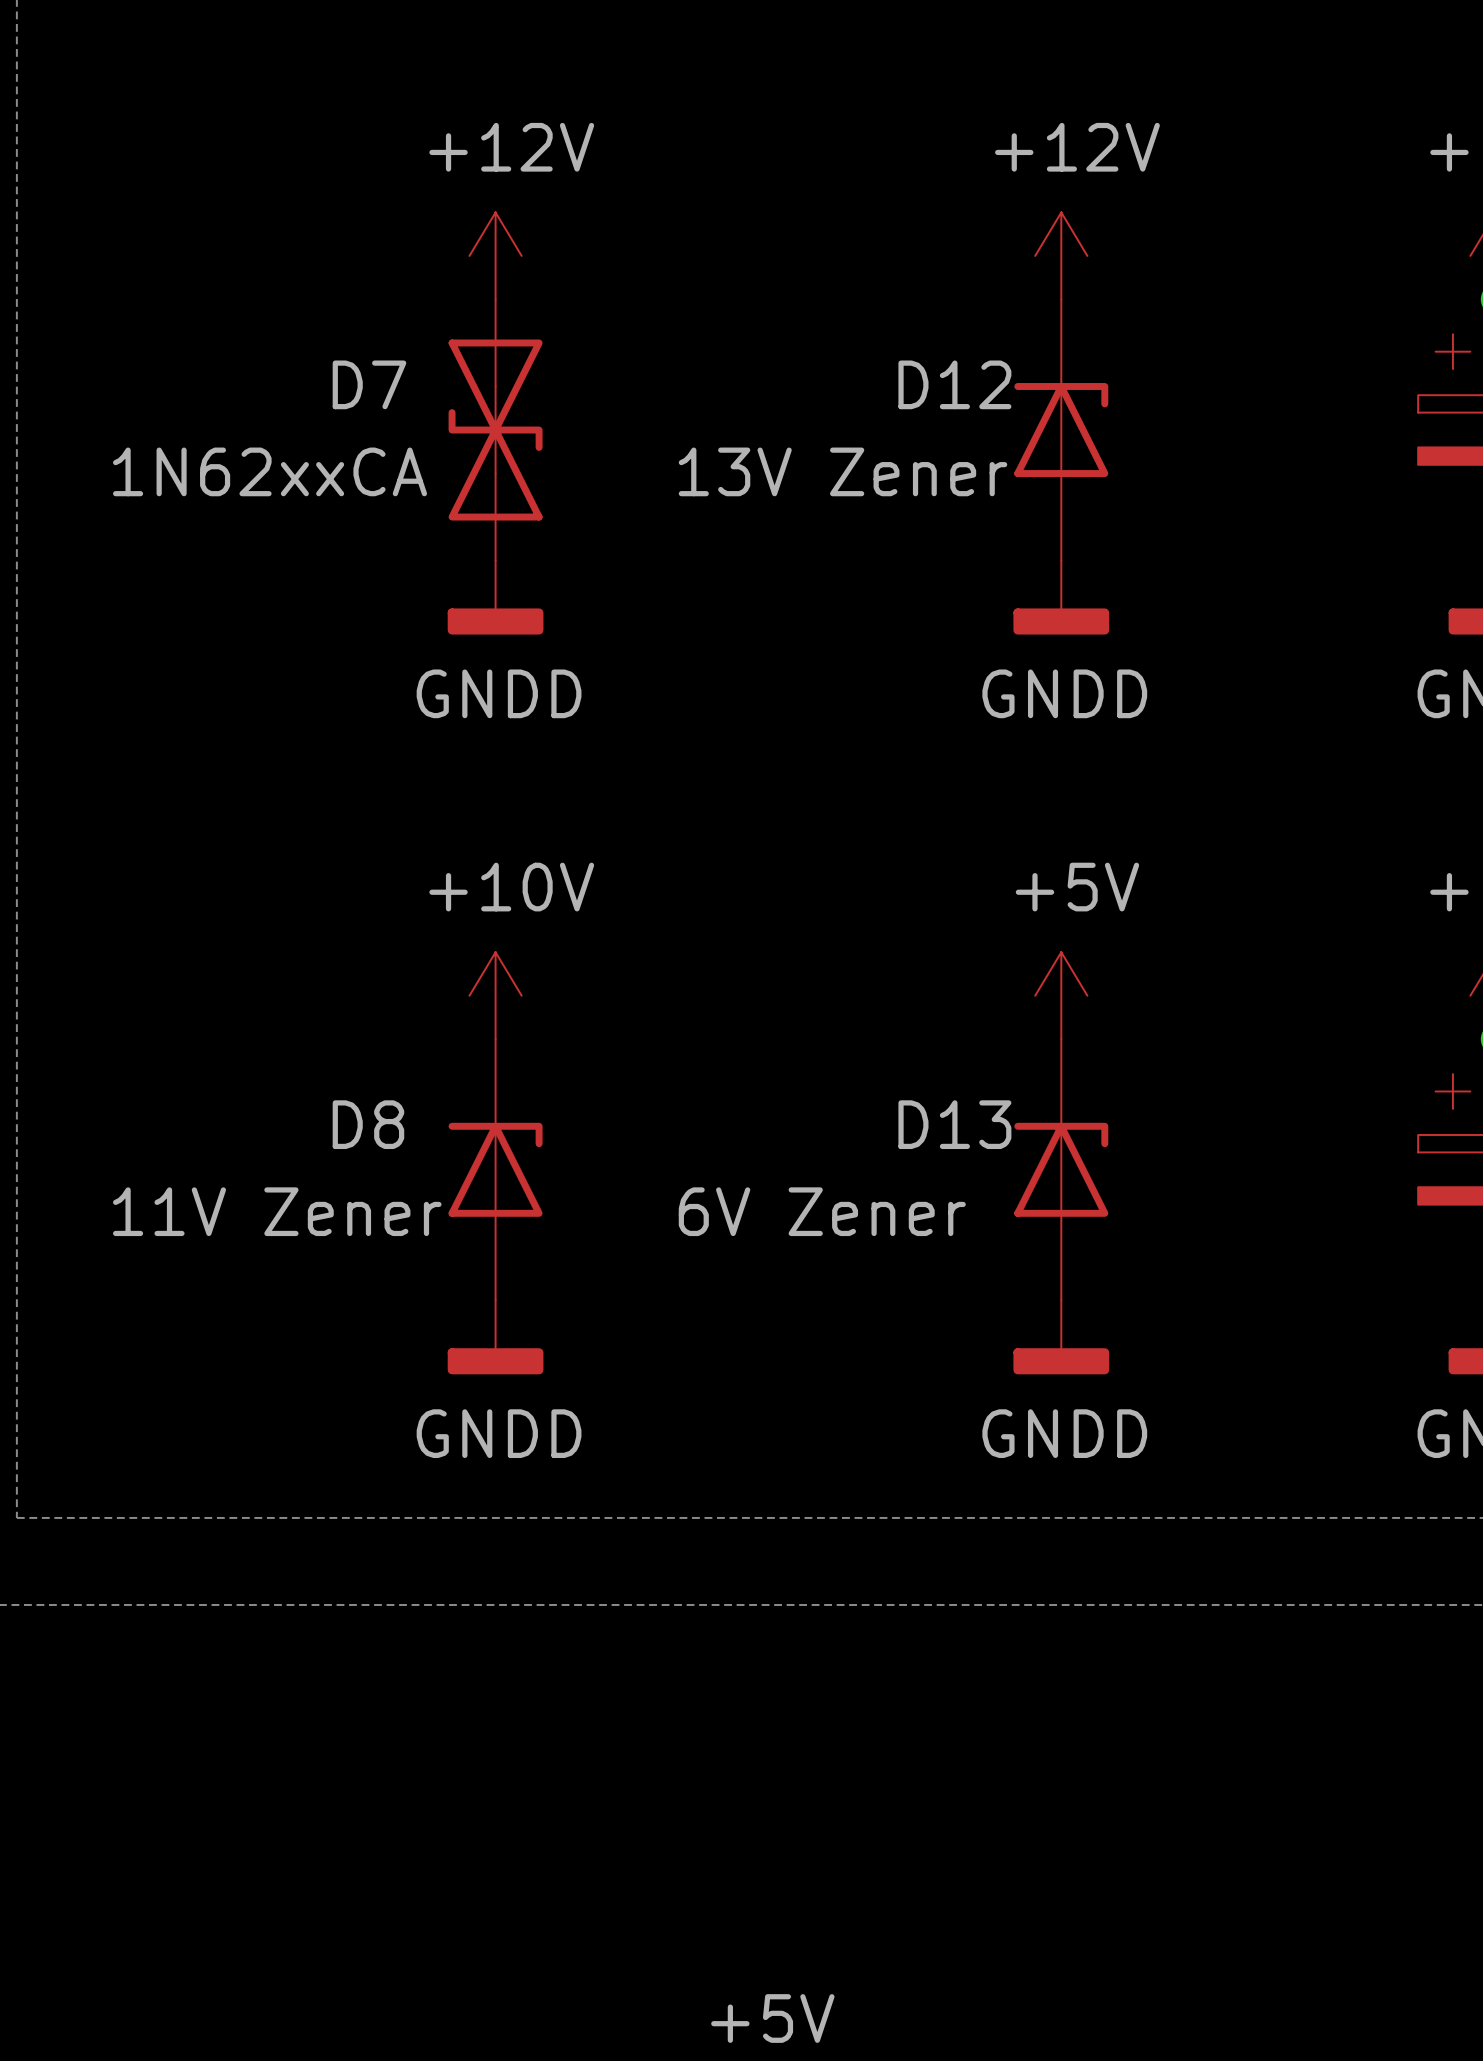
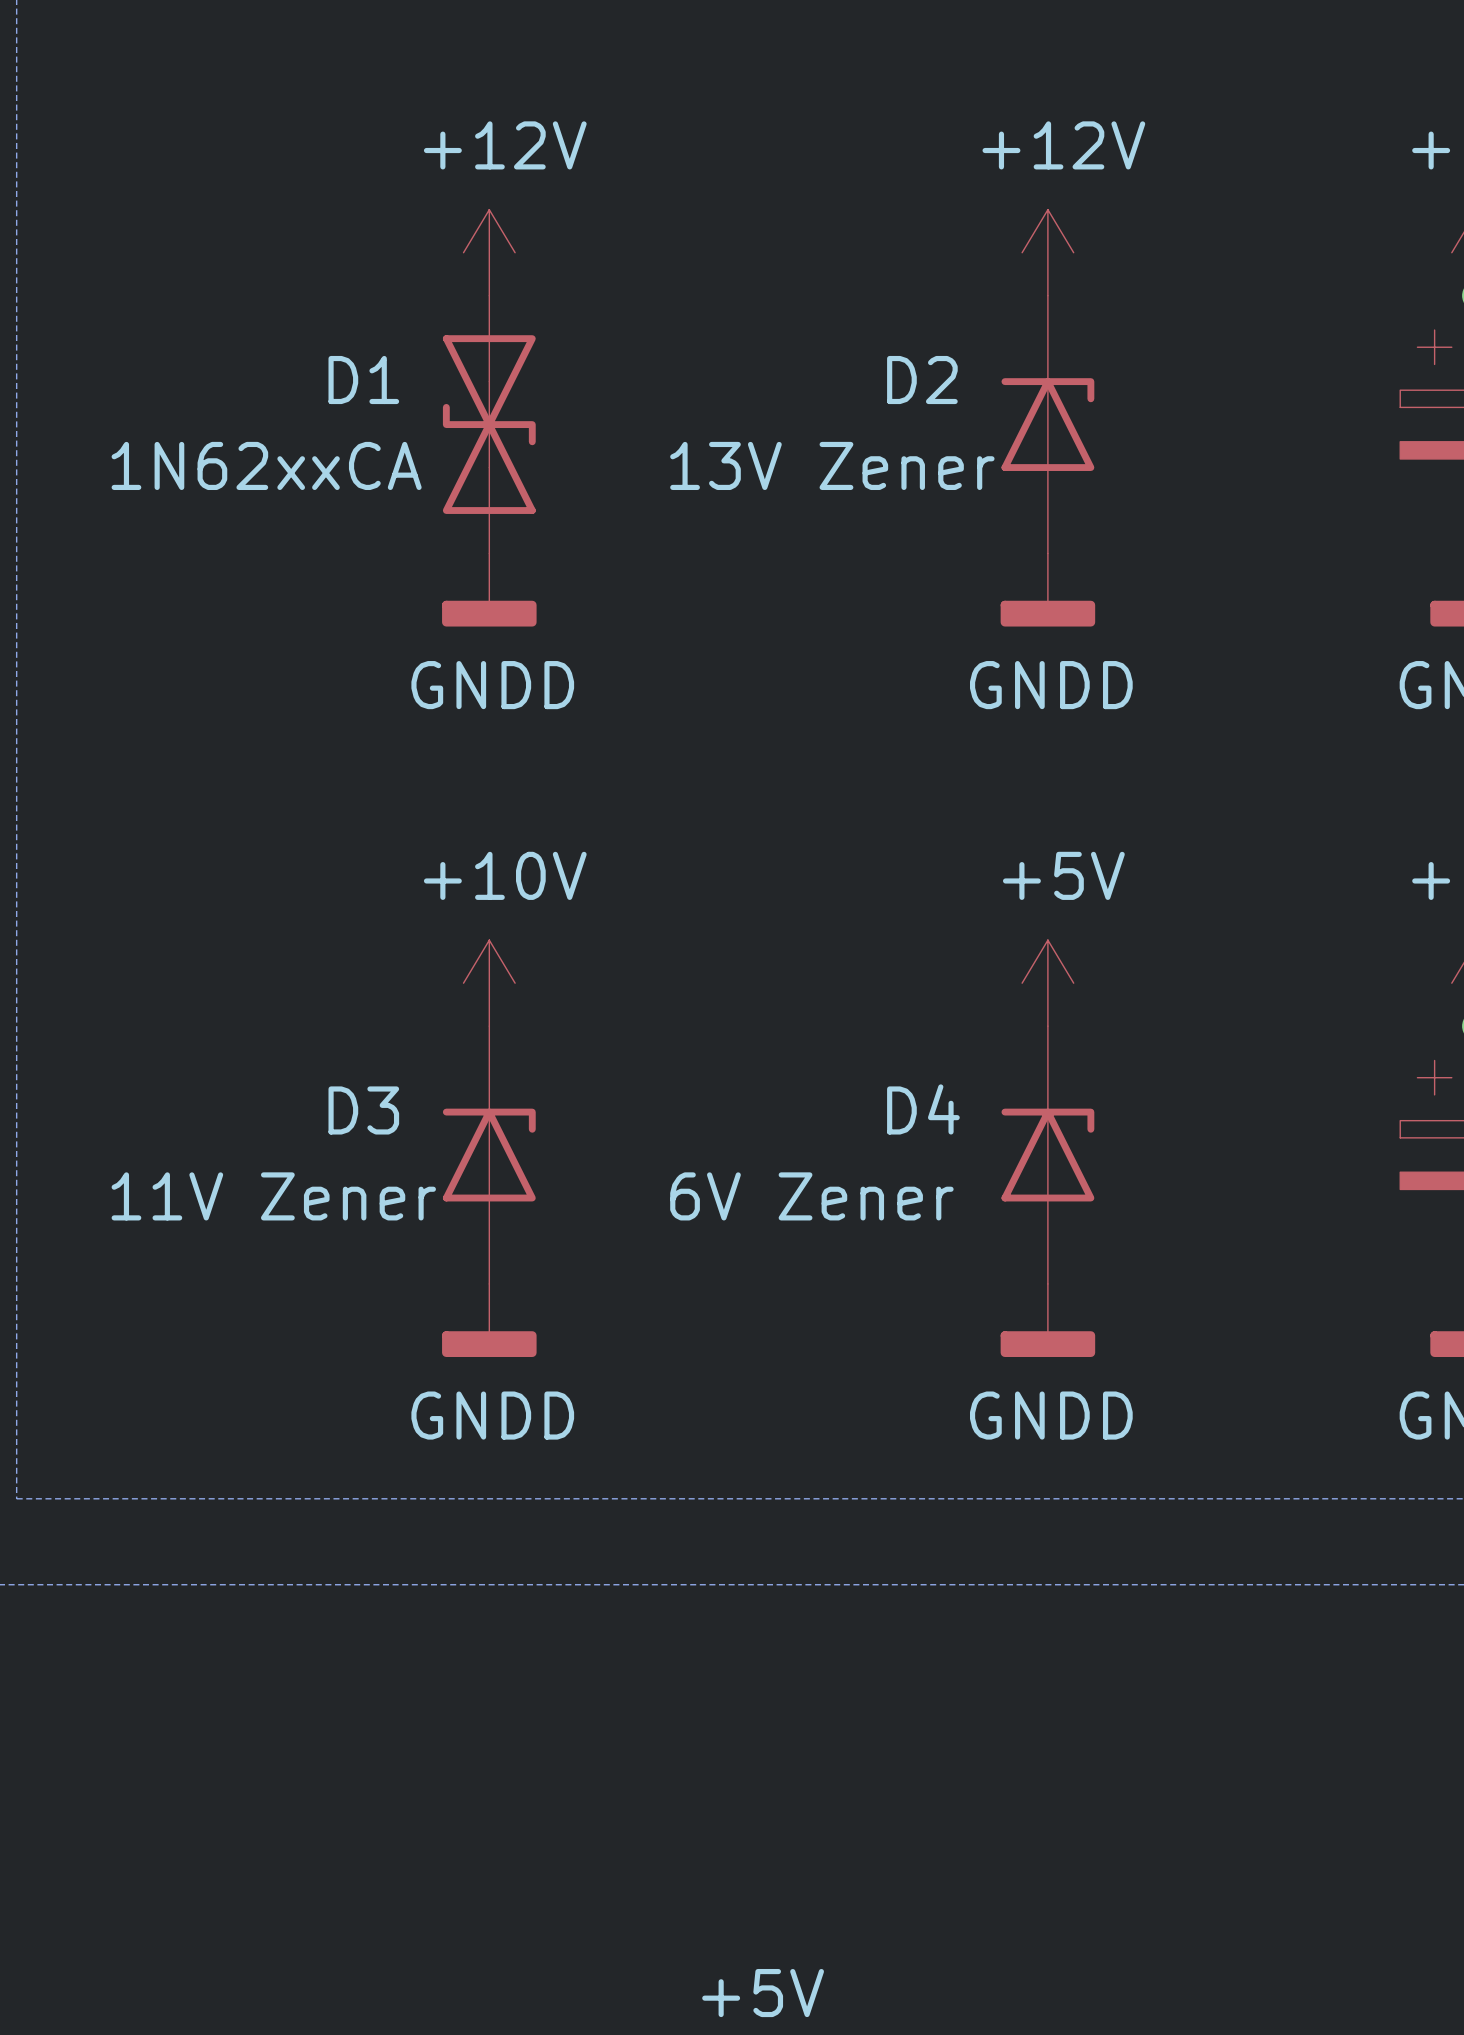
D7 name: D7 (369, 384) -> D1 (363, 380)
D12 name: D12 (954, 384) -> D2 (922, 380)
D8 name: D8 (368, 1124) -> D3 (363, 1110)
D13 name: D13 (954, 1124) -> D4 (923, 1109)

